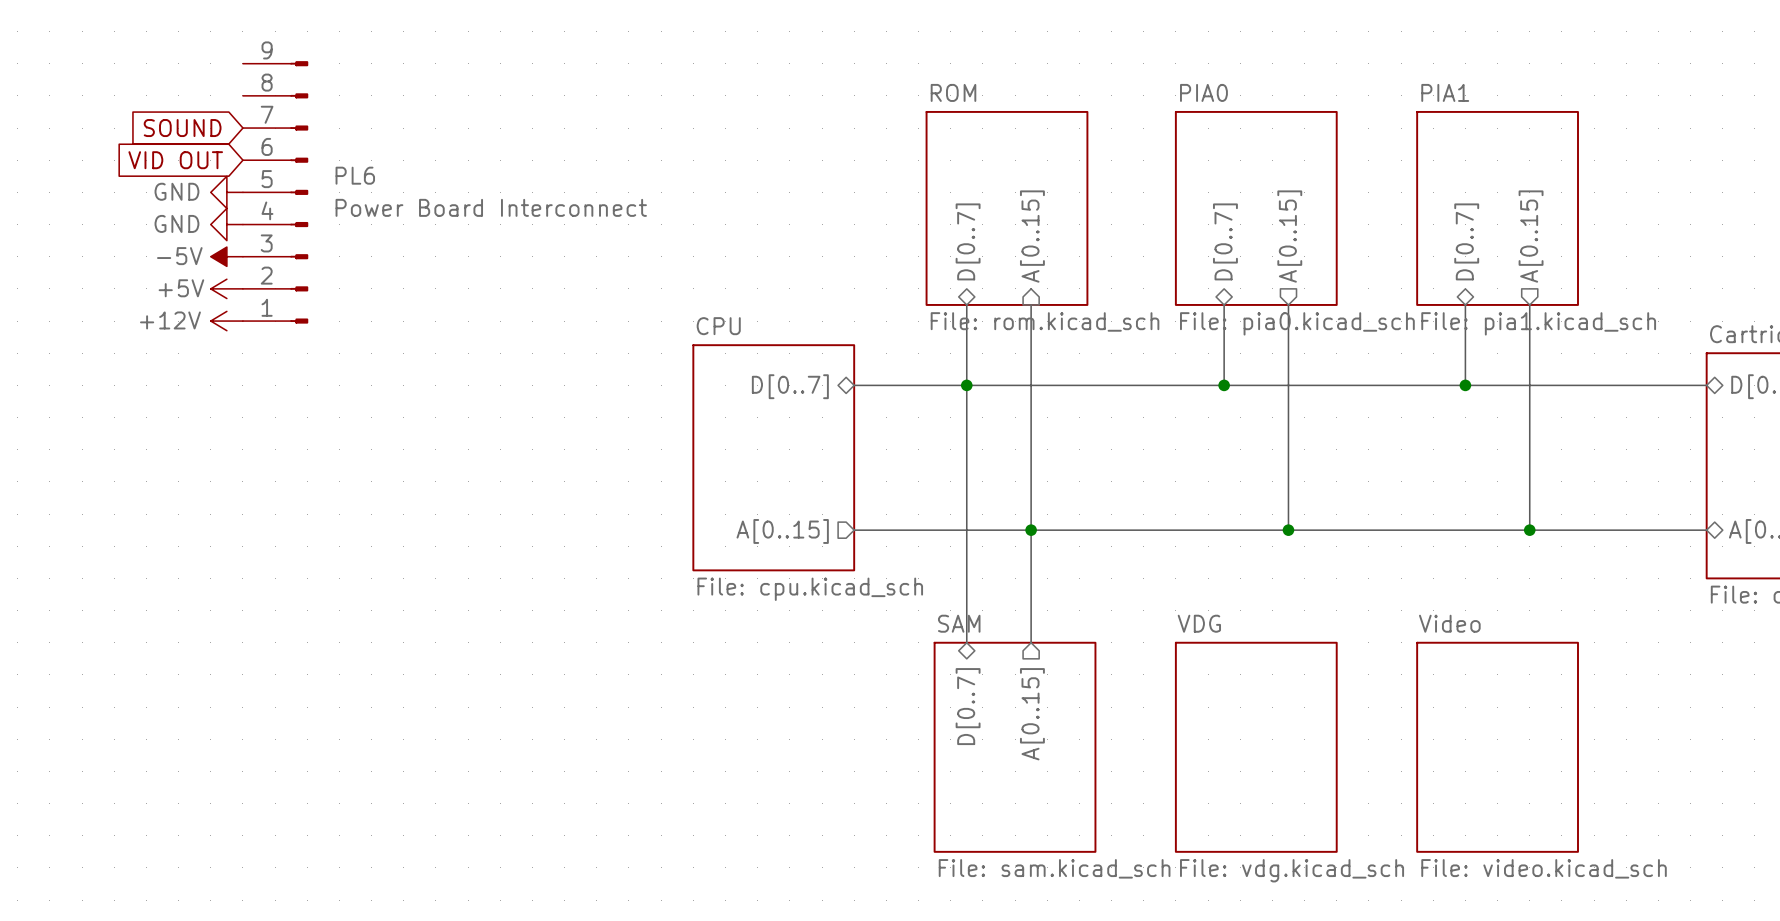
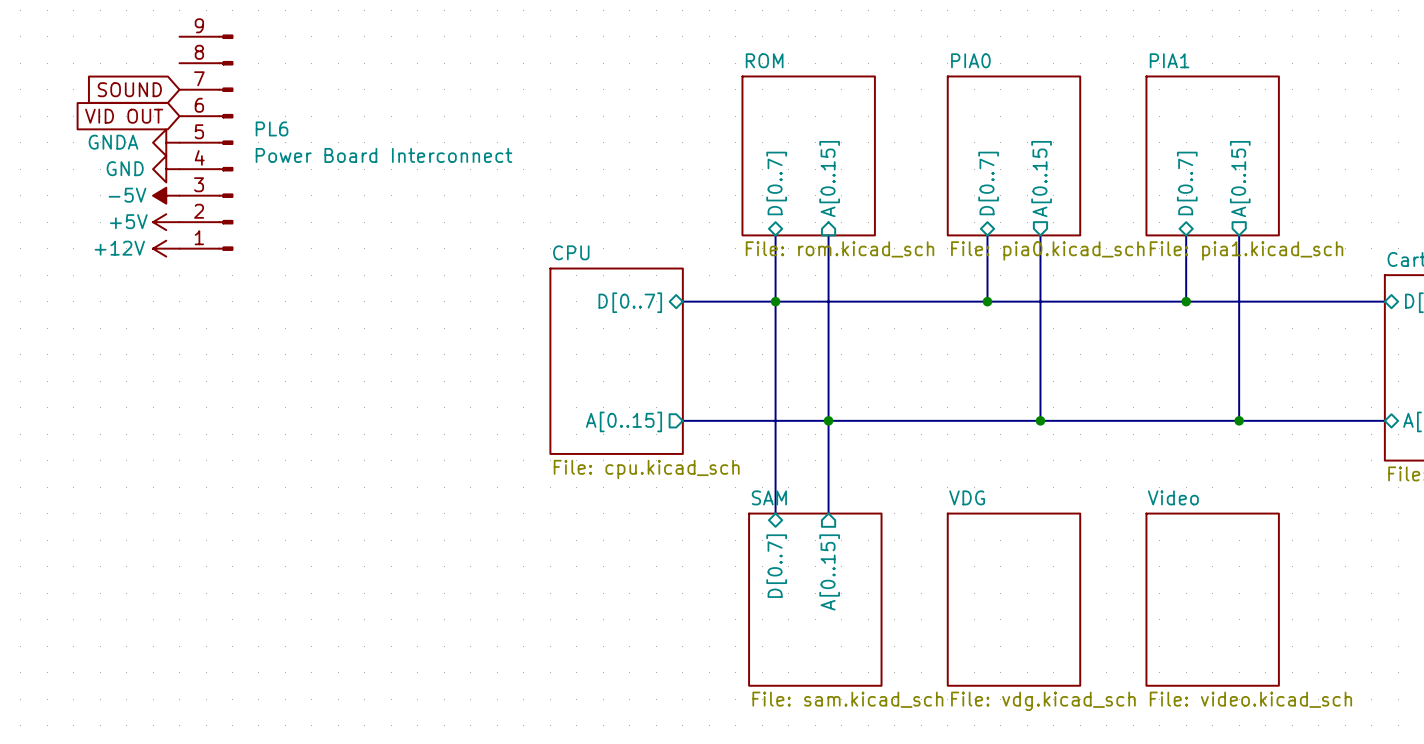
power symbol: GND (226, 192) -> GNDA (166, 142)

